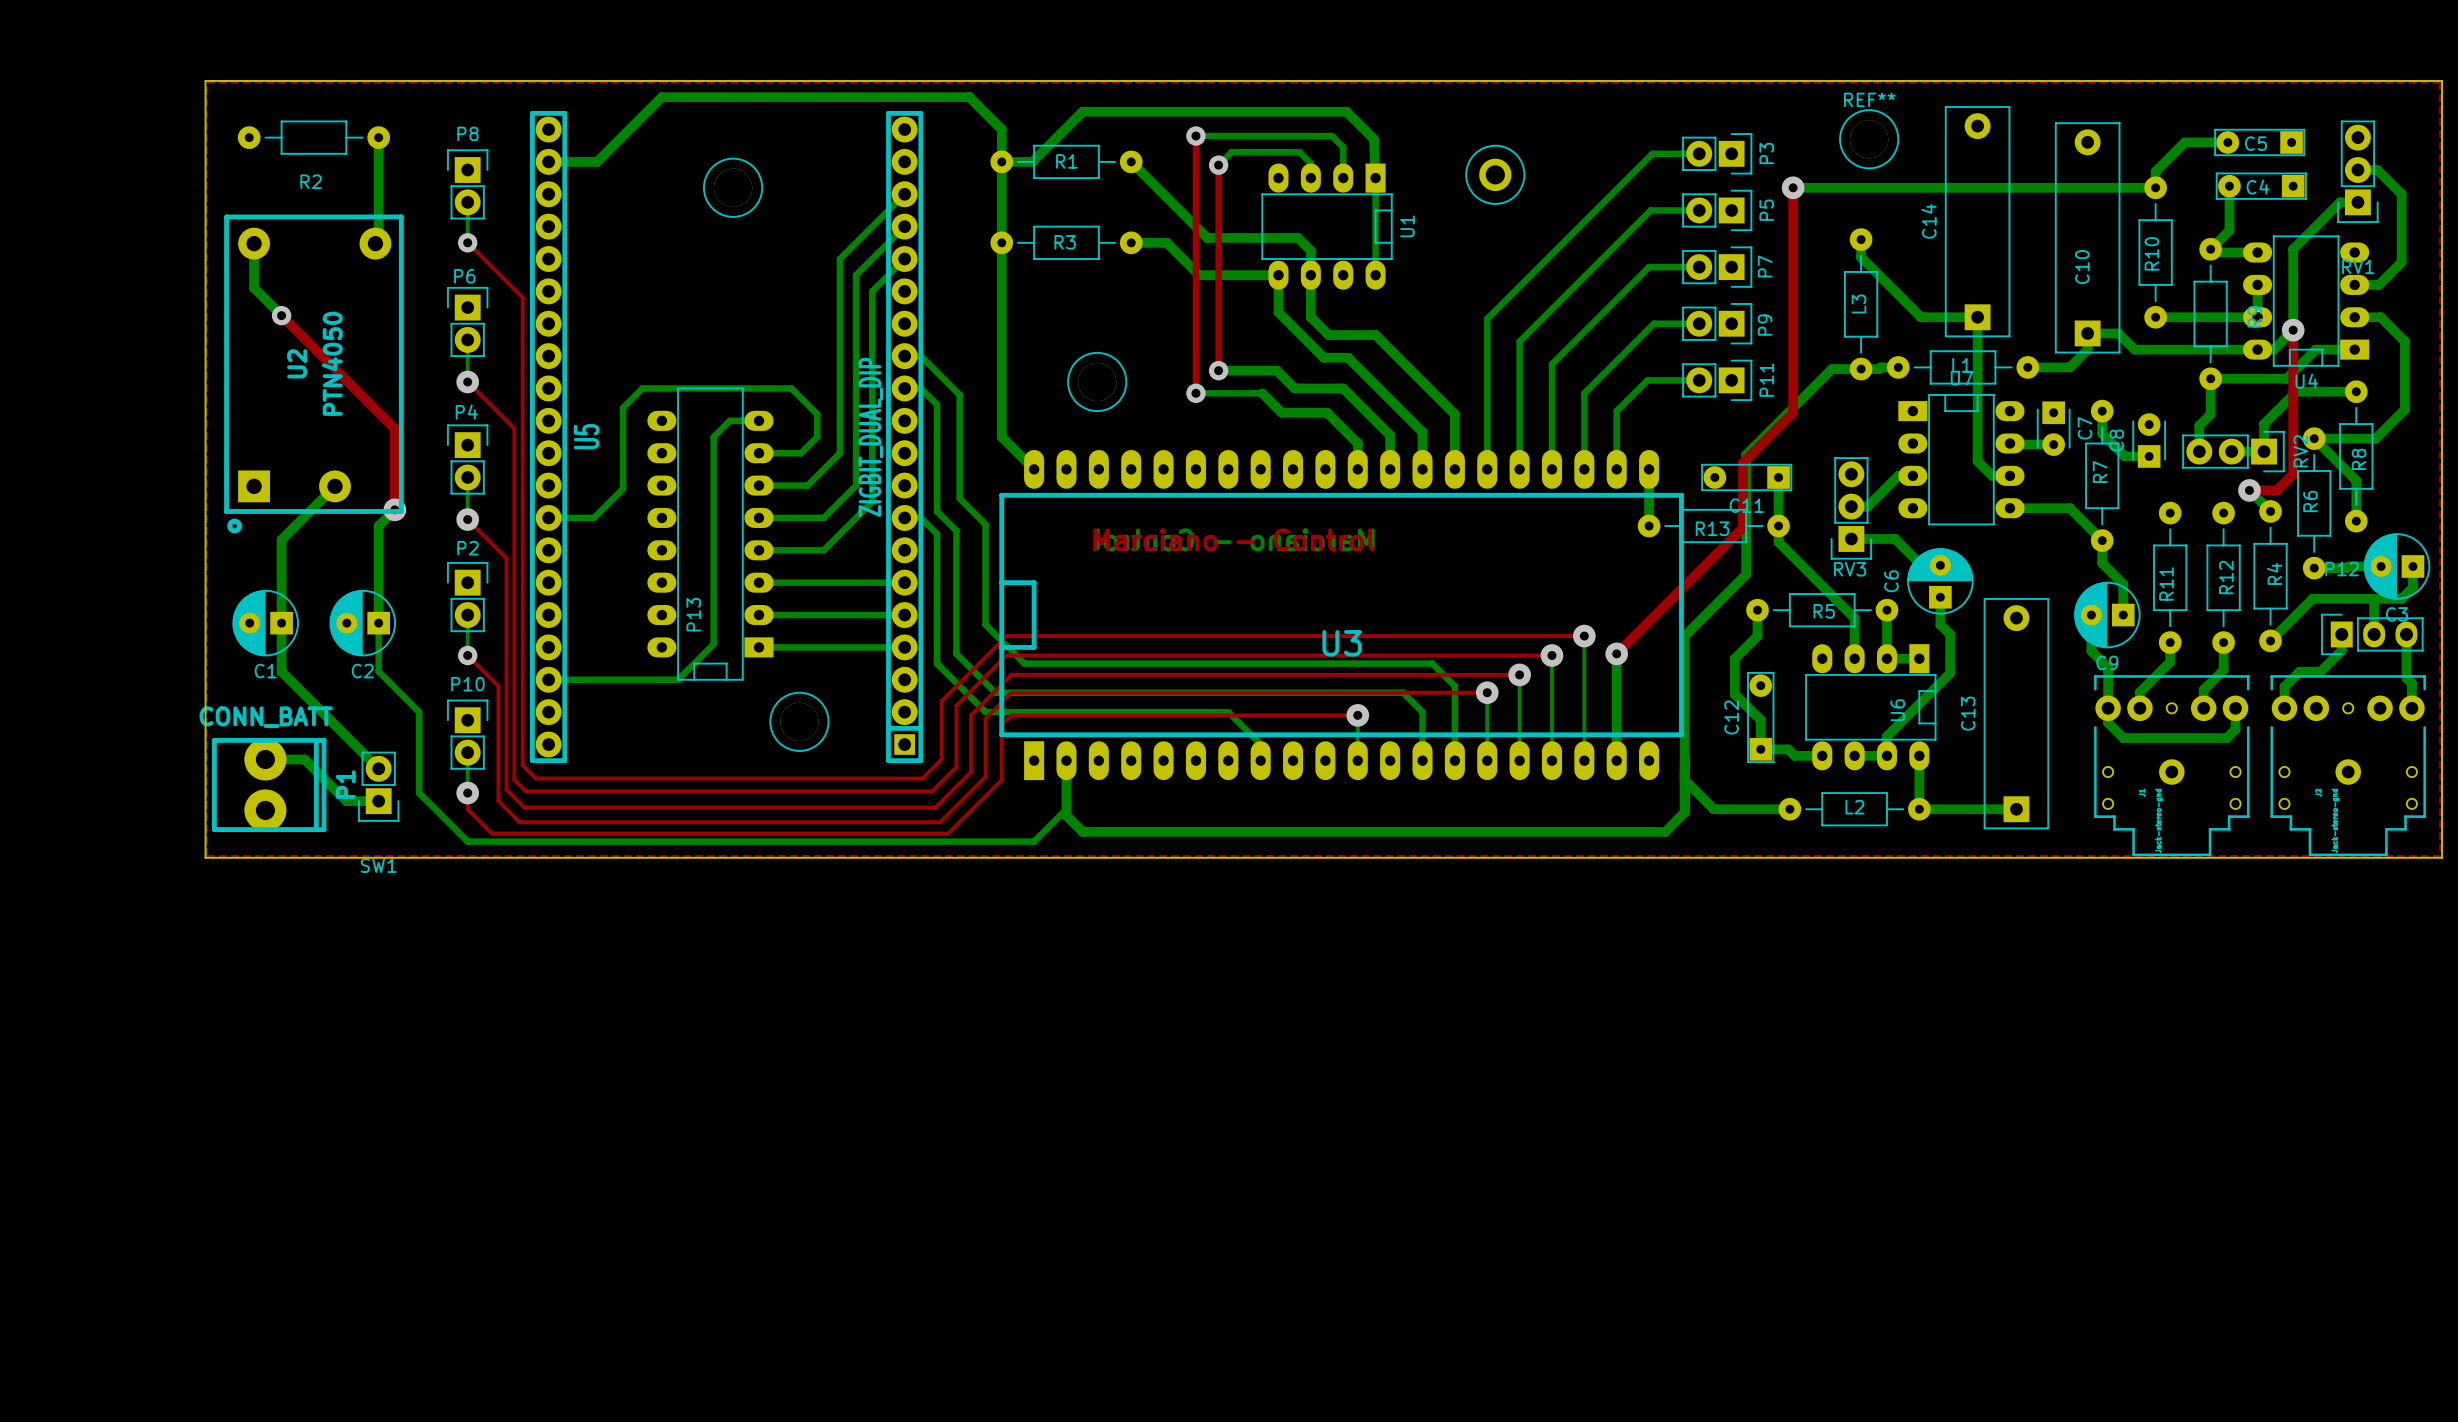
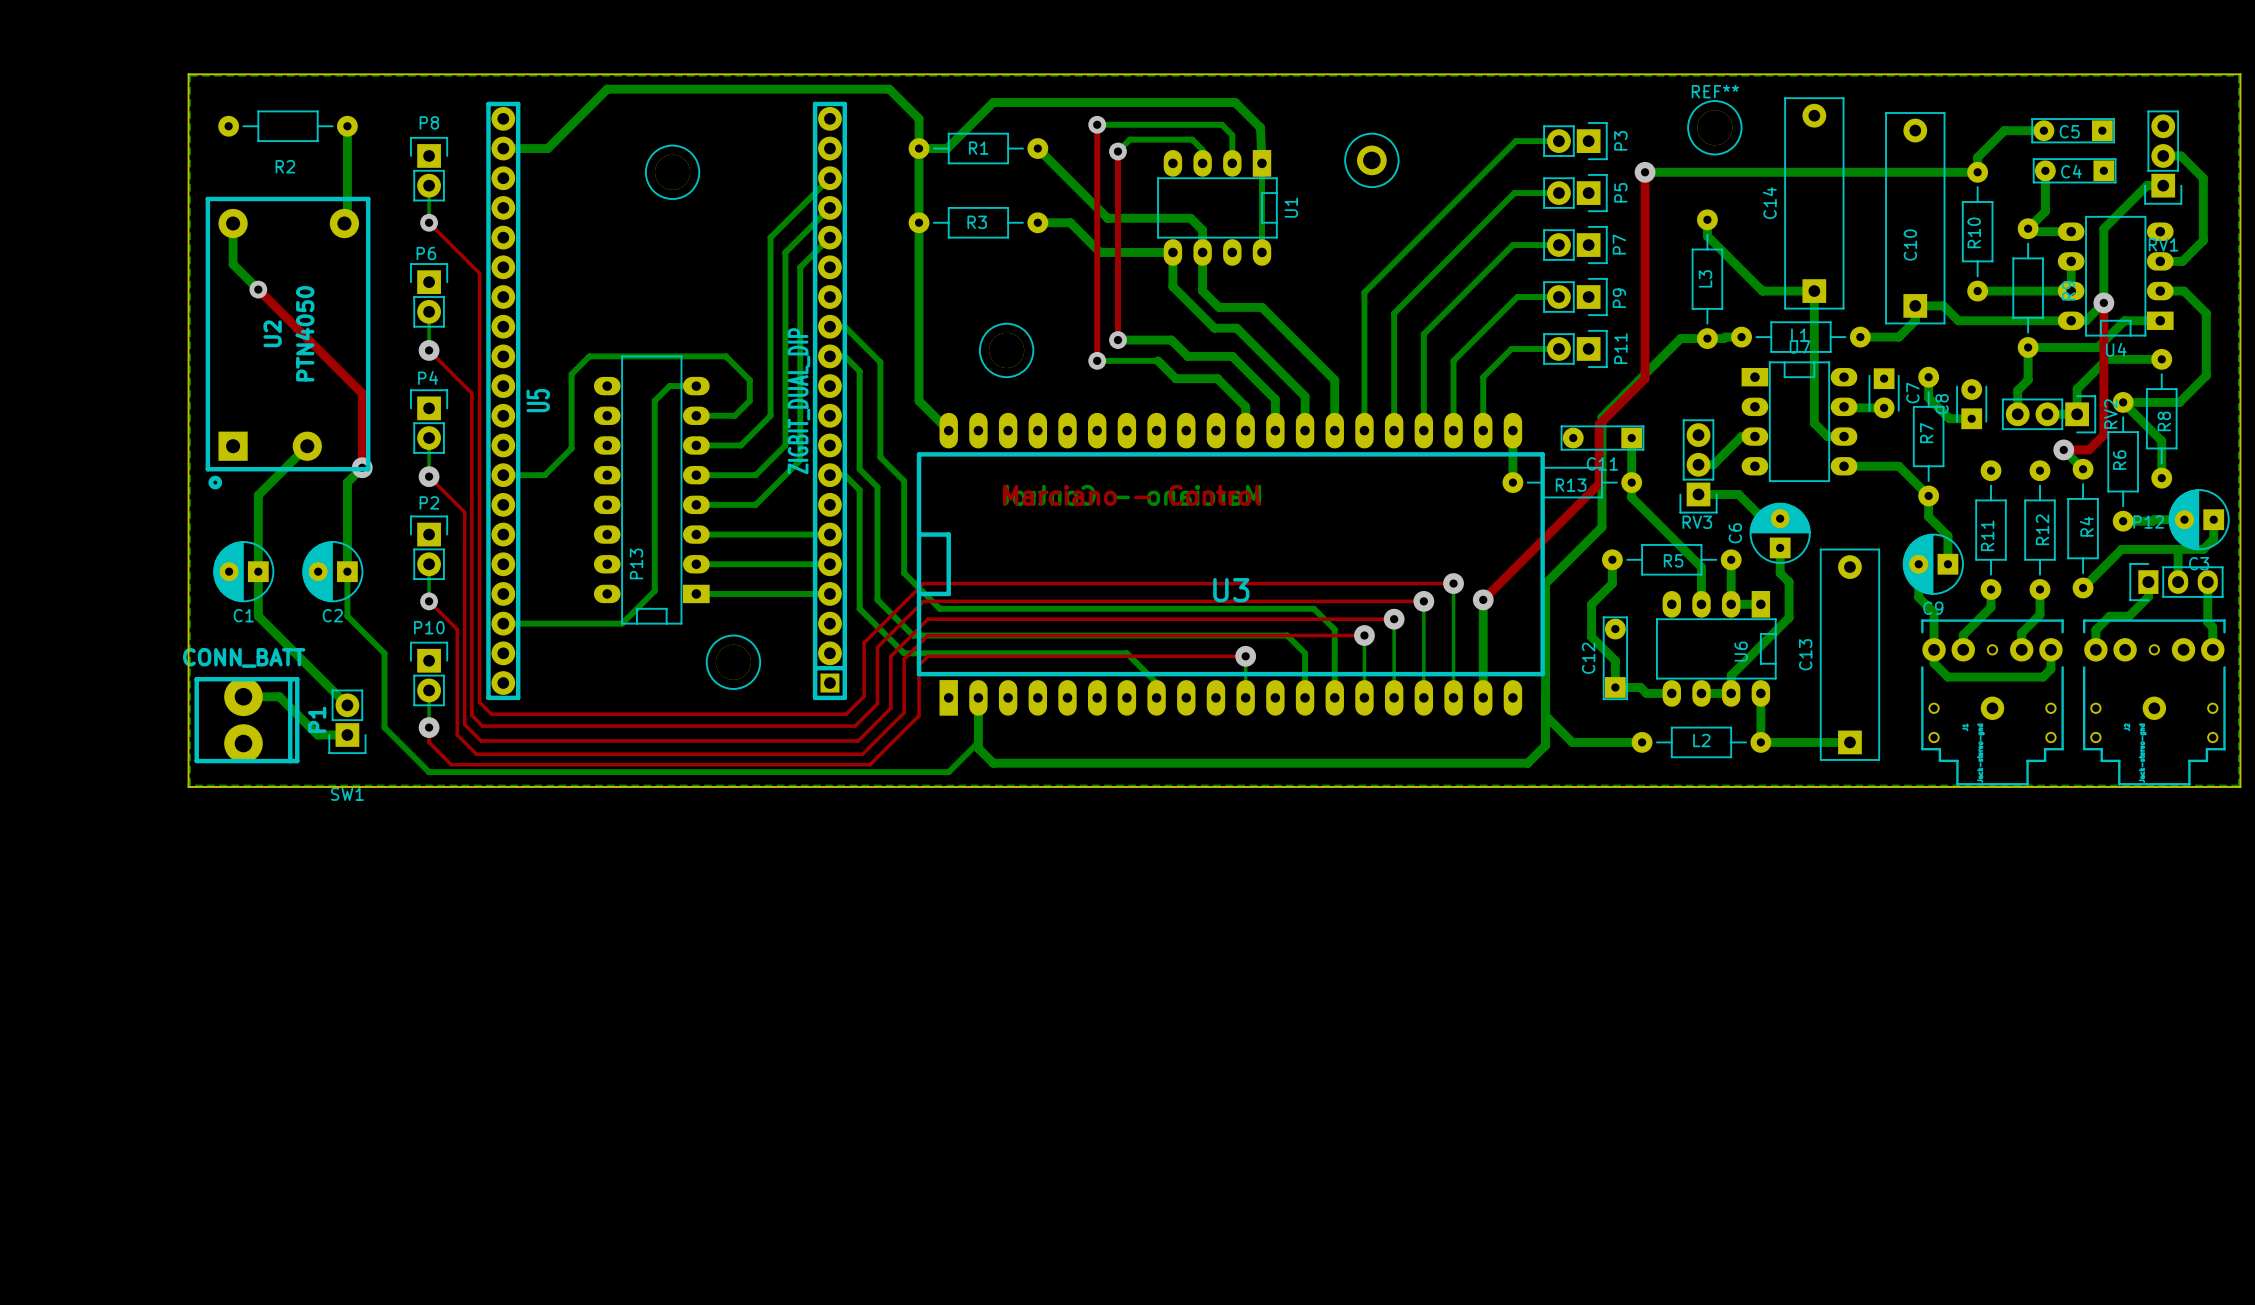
top zone outline: (207, 82) (207, 856) (2440, 856) (2440, 82) (207, 82) -> none

